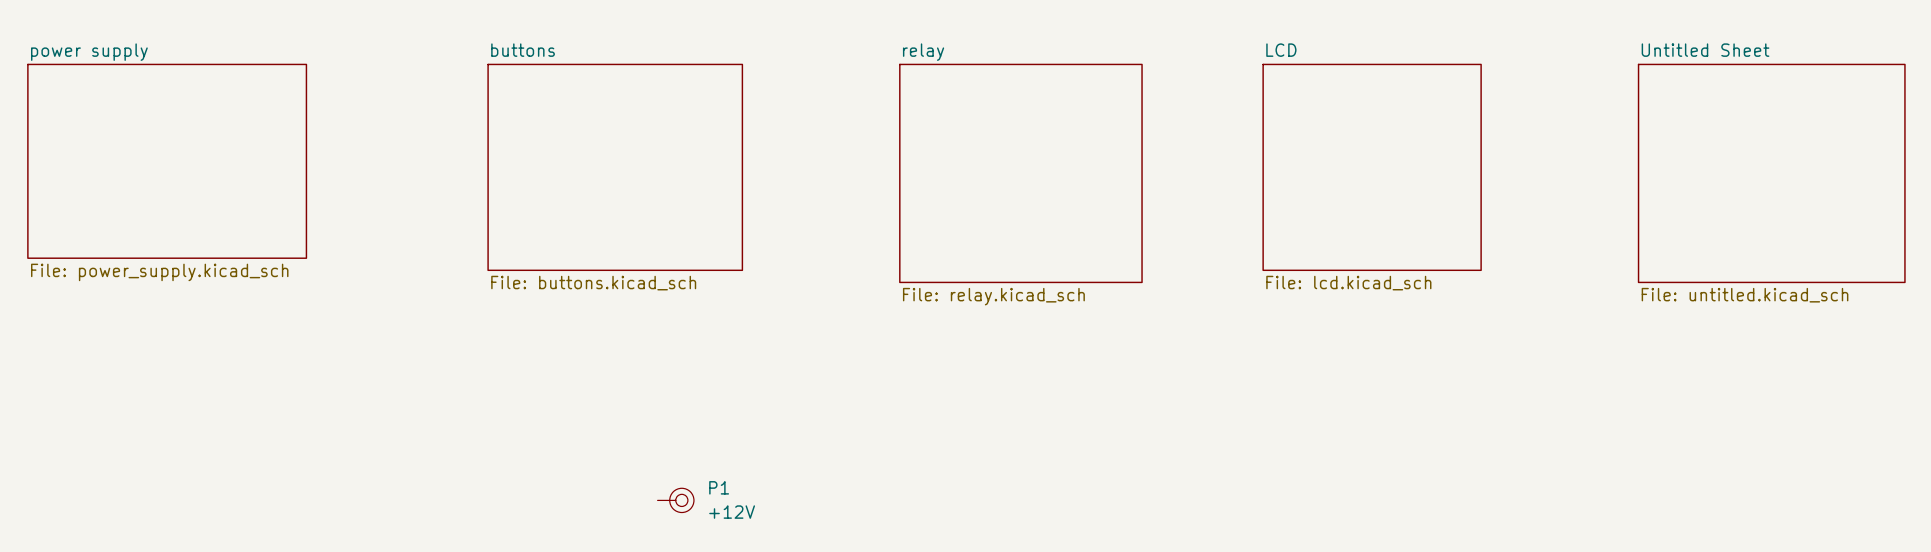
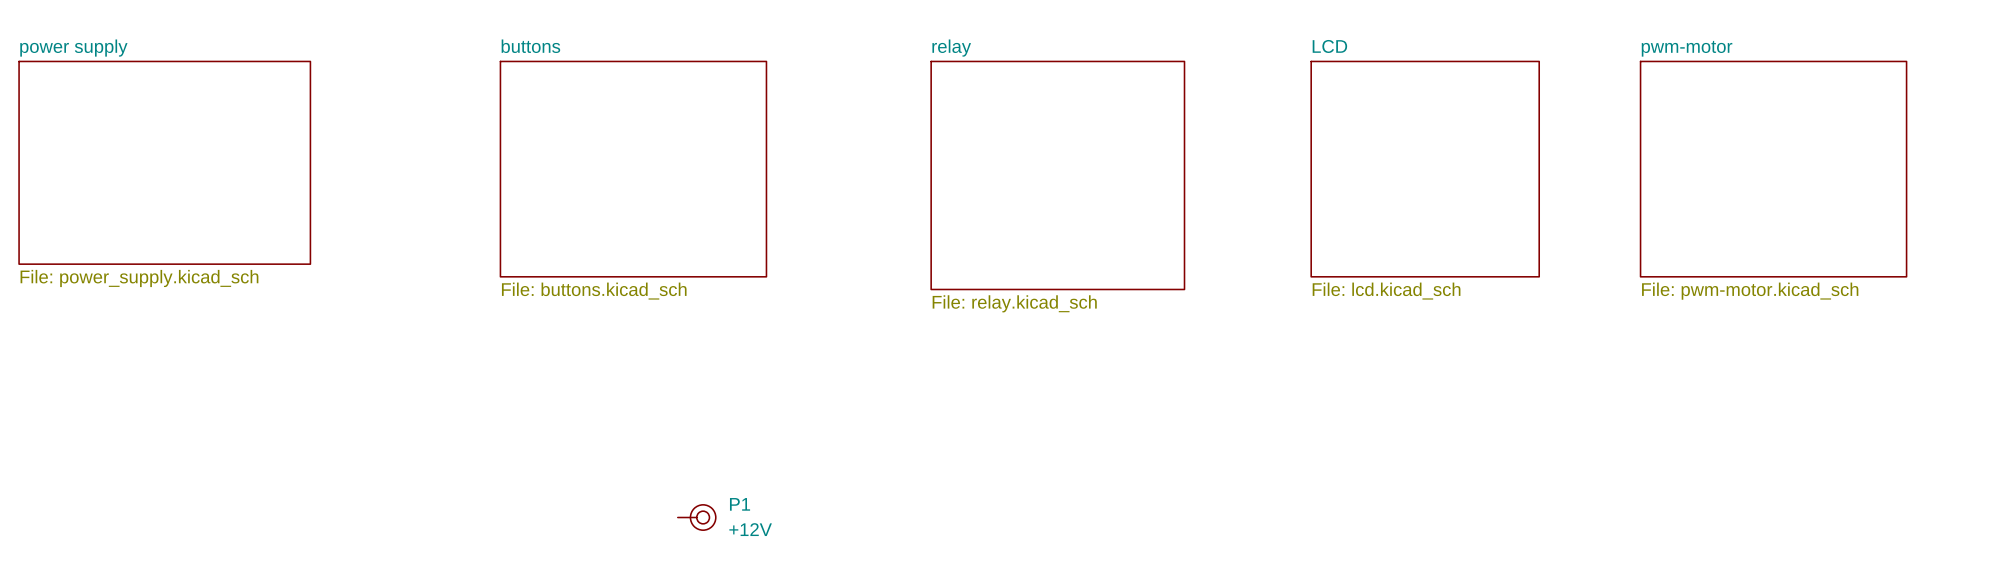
sheet pwm-motor: none -> File: pwm-motor.kicad_sch (1773, 169)
sheet Untitled Sheet: File: untitled.kicad_sch (1771, 173) -> none

